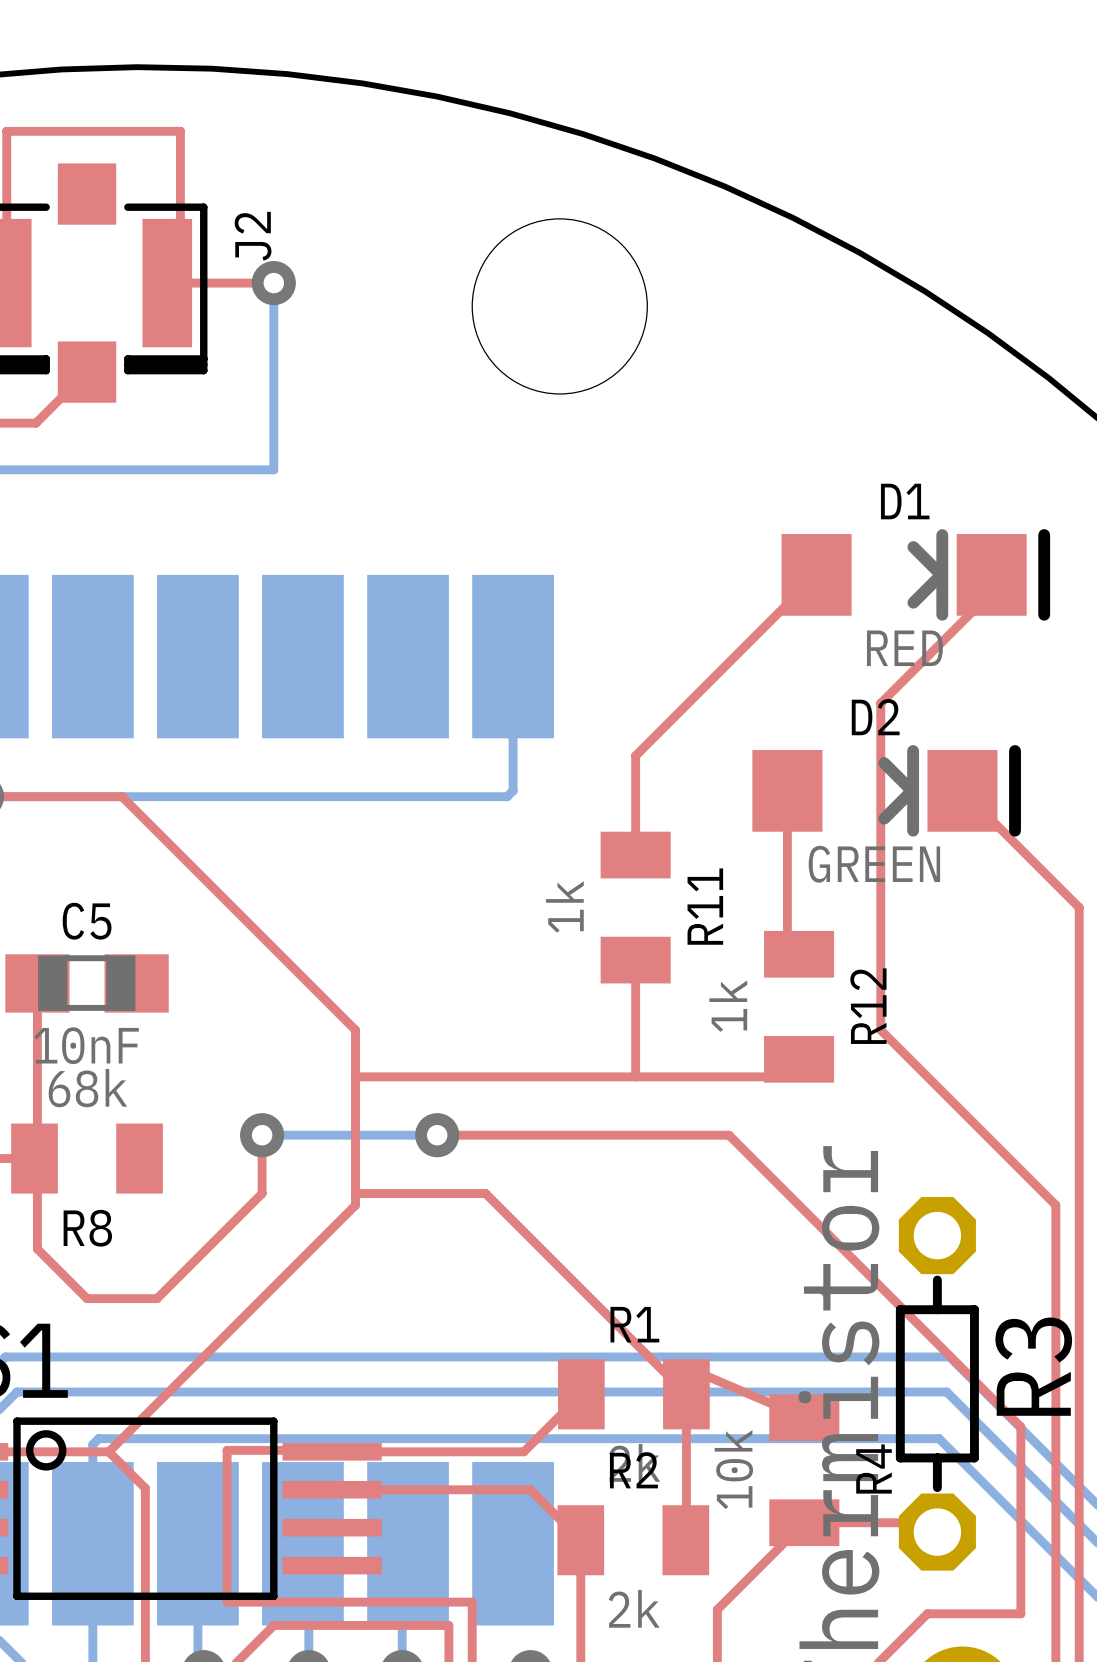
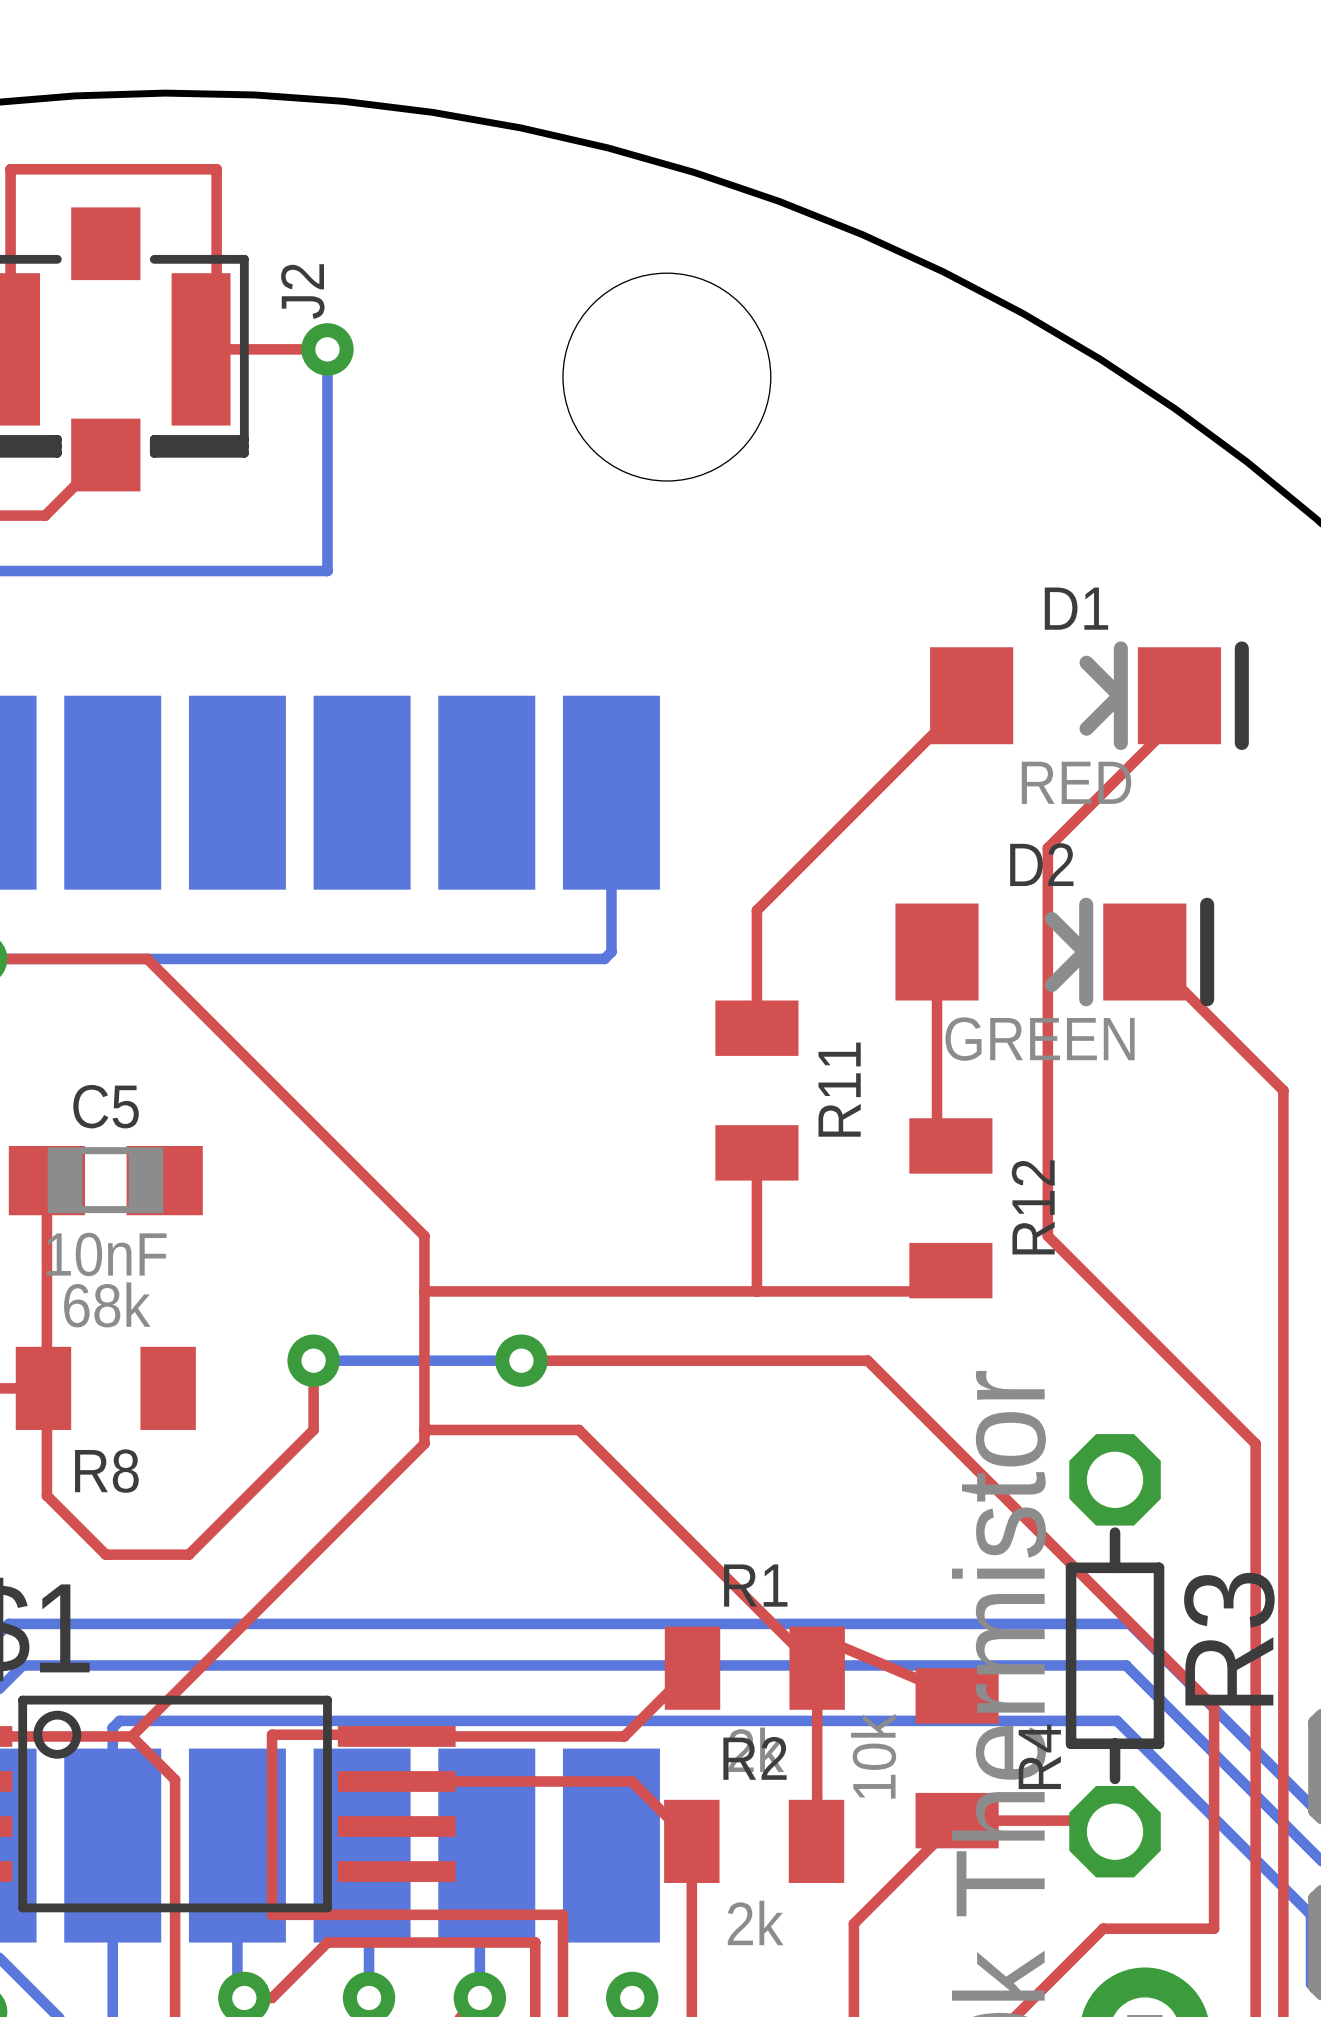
R11 value: 1k (564, 906) -> none
R12 value: 1k (728, 1006) -> none

